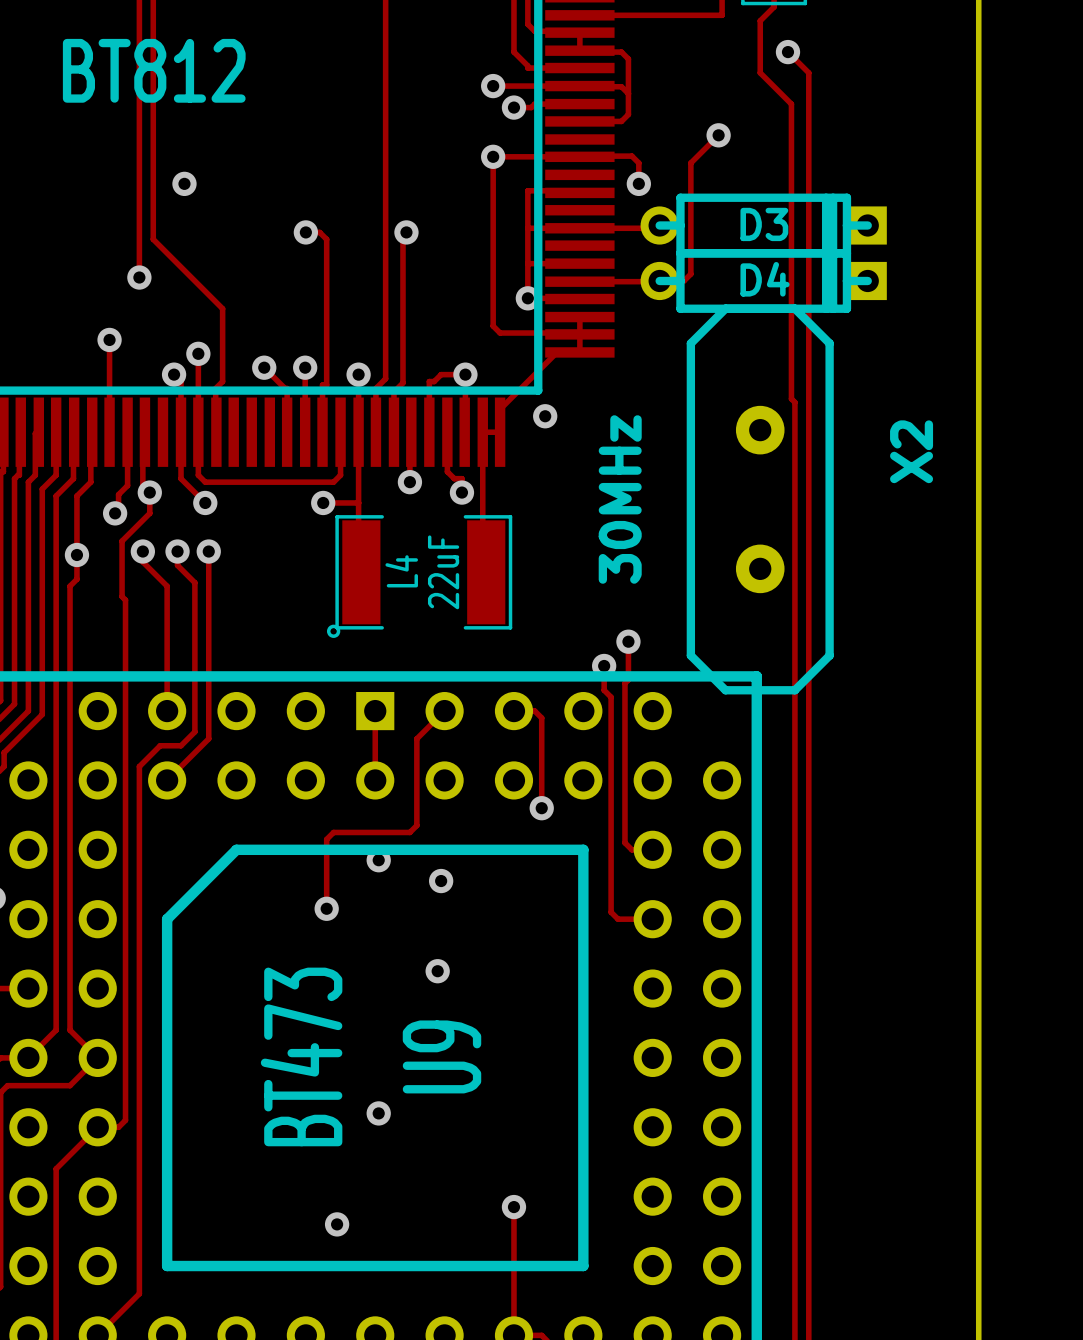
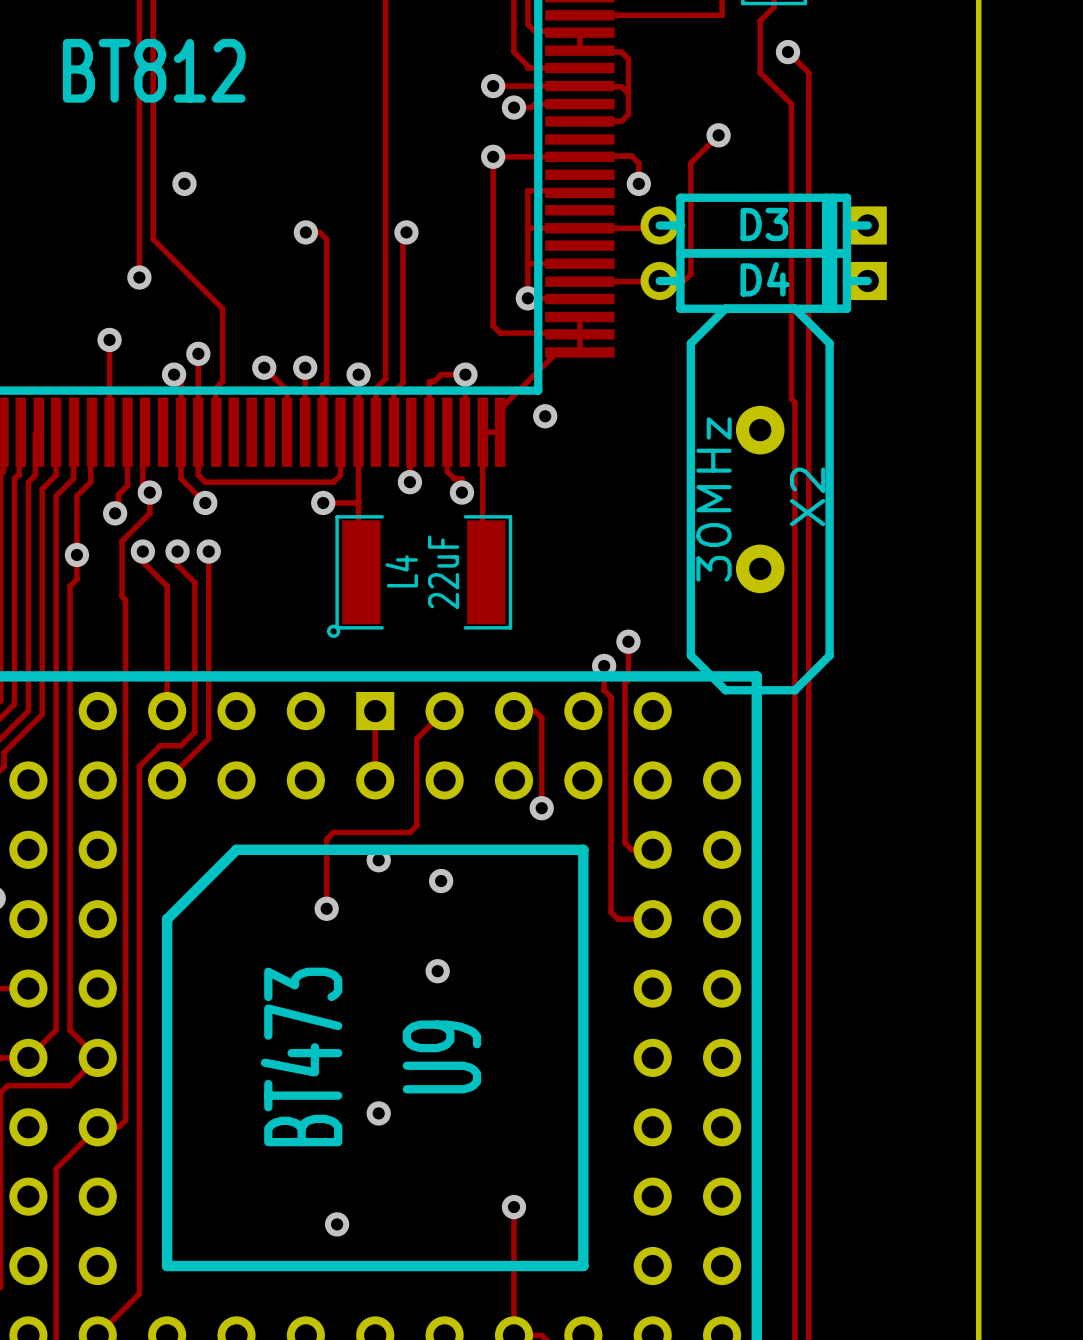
X2 name position: X2 (911, 451) -> X2 (807, 496)
X2 value position: 30MHz (620, 499) -> 30MHz (713, 499)

